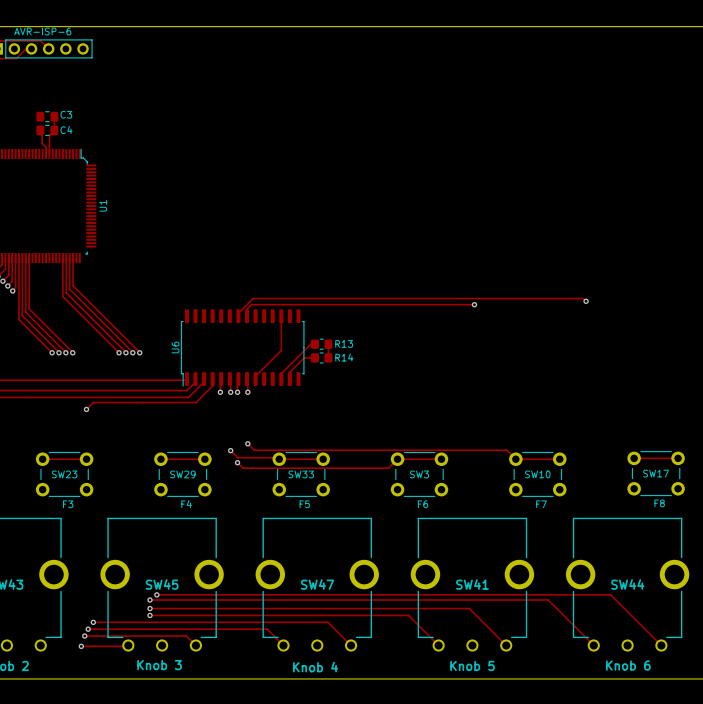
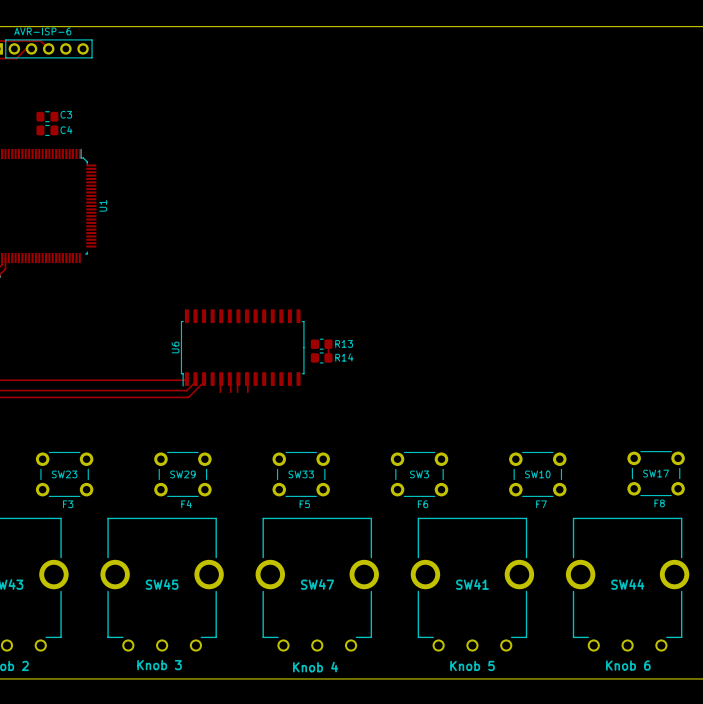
track: (54, 116) (54, 130) (49, 135) (49, 153) -> none
track: (40, 130) (42, 132) (42, 143) (46, 147) (46, 153) -> none
track: (8, 258) (8, 275) (2, 281) -> none
track: (12, 258) (12, 281) (7, 286) -> none
track: (15, 258) (15, 288) (12, 290) -> none
track: (18, 258) (18, 319) (52, 352) -> none
track: (22, 258) (22, 315) (59, 352) -> none
track: (25, 258) (25, 312) (65, 352) -> none
track: (29, 258) (29, 308) (72, 352) -> none
track: (62, 258) (62, 296) (119, 352) -> none
track: (66, 258) (66, 292) (125, 352) -> none
track: (69, 258) (69, 289) (132, 352) -> none
track: (73, 258) (73, 285) (139, 352) -> none
via: (2, 281) -> none
via: (7, 286) -> none
via: (12, 290) -> none
track: (586, 301) (583, 298) (253, 298) (238, 313) (238, 316) -> none
via: (586, 301) -> none
track: (474, 304) (251, 304) (246, 309) (246, 316) -> none
via: (474, 304) -> none
track: (281, 316) (281, 350) (255, 376) (255, 379) -> none
track: (314, 344) (310, 344) (281, 373) (281, 379) -> none
via: (52, 352) -> none
via: (59, 352) -> none
via: (65, 352) -> none
via: (72, 352) -> none
via: (119, 352) -> none
via: (125, 352) -> none
via: (132, 352) -> none
via: (139, 352) -> none
track: (314, 357) (304, 357) (289, 372) (289, 379) -> none
track: (212, 379) (212, 385) (196, 402) (93, 402) (86, 409) -> none
via: (220, 392) -> none
via: (230, 392) -> none
via: (237, 392) -> none
via: (247, 392) -> none
via: (86, 409) -> none
track: (247, 443) (254, 450) (506, 450) (515, 459) (559, 459) -> none
via: (247, 443) -> none
track: (230, 450) (237, 457) (323, 459) -> none
via: (230, 450) -> none
track: (634, 458) (678, 458) -> none
track: (42, 459) (86, 459) -> none
track: (160, 459) (204, 459) -> none
track: (441, 459) (397, 459) (388, 468) (243, 468) (237, 462) -> none
via: (237, 462) -> none
track: (156, 594) (610, 594) (661, 645) -> none
via: (156, 594) -> none
track: (149, 600) (548, 600) (593, 645) -> none
via: (149, 600) -> none
track: (150, 608) (469, 608) (506, 645) -> none
via: (150, 608) -> none
track: (149, 615) (408, 615) (438, 645) -> none
via: (149, 615) -> none
track: (93, 622) (327, 622) (351, 645) -> none
via: (93, 622) -> none
track: (88, 629) (267, 629) (283, 645) -> none
via: (88, 629) -> none
track: (84, 636) (186, 636) (195, 645) -> none
via: (84, 636) -> none
track: (128, 645) (81, 646) -> none
via: (81, 646) -> none

